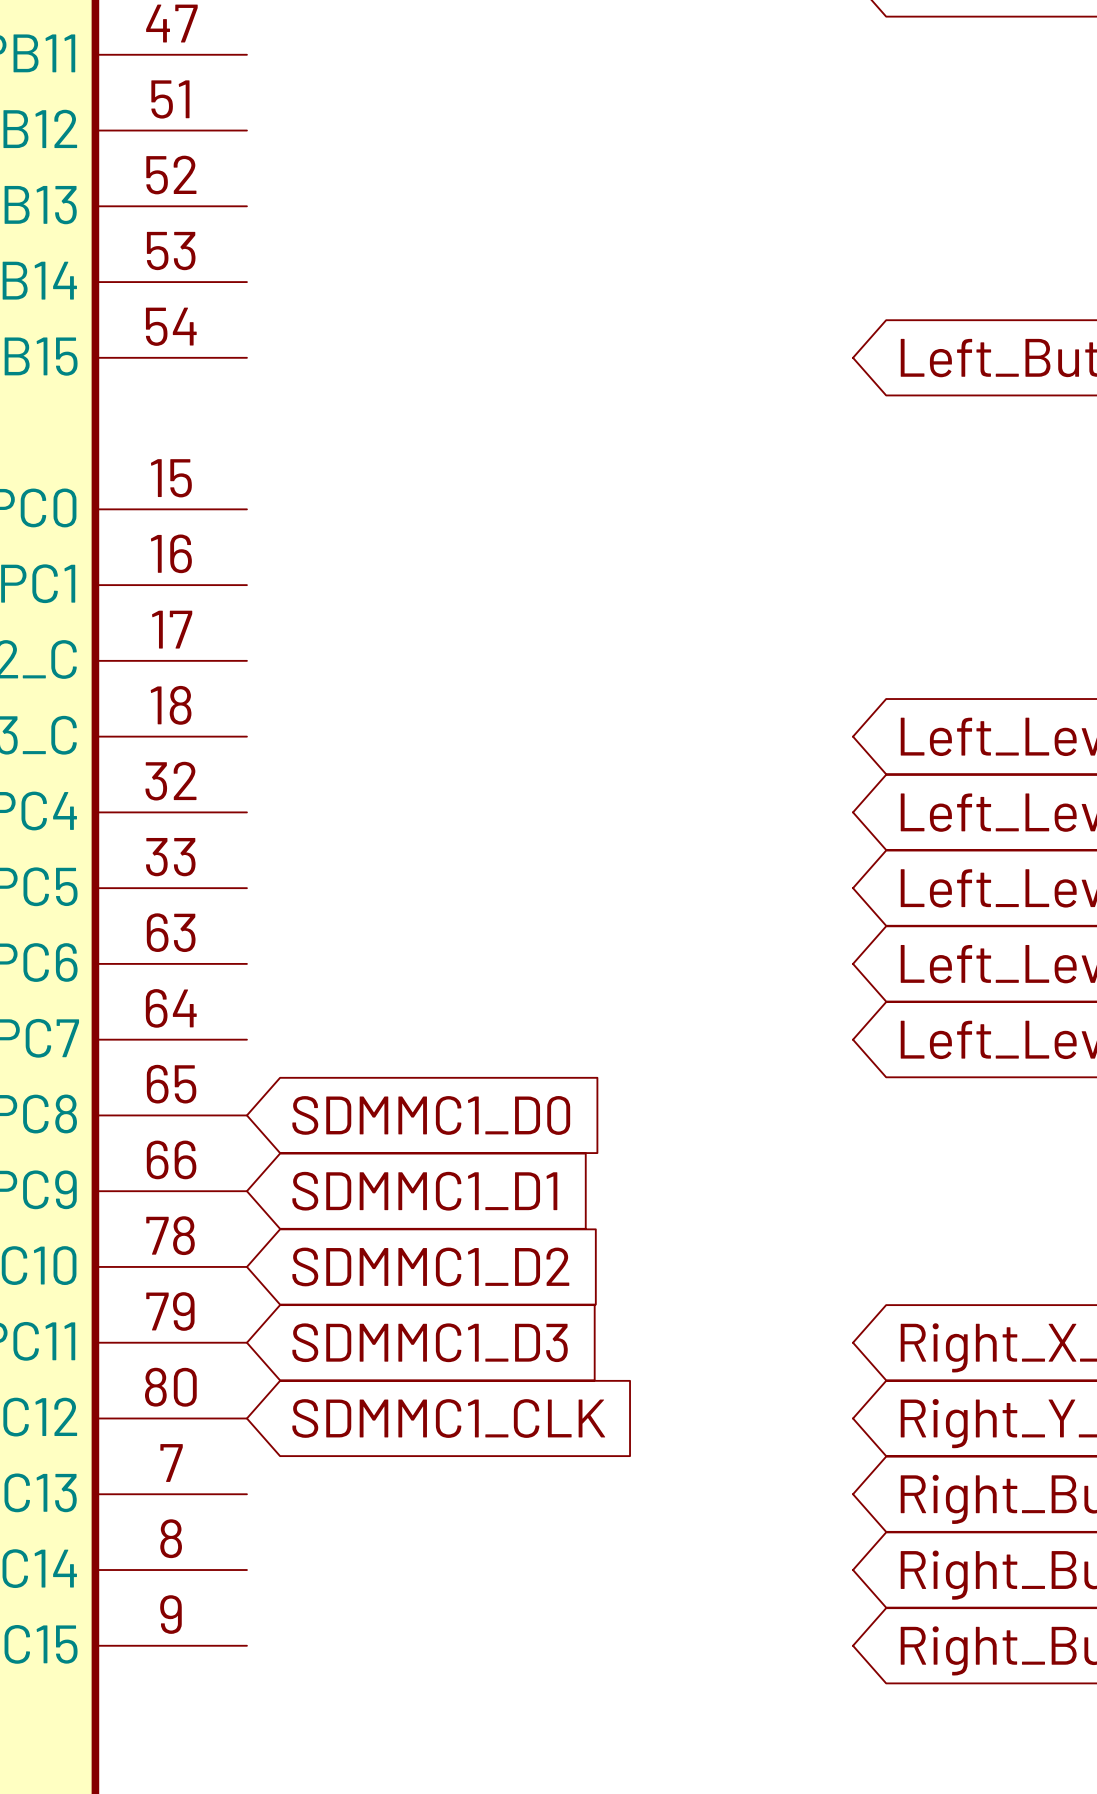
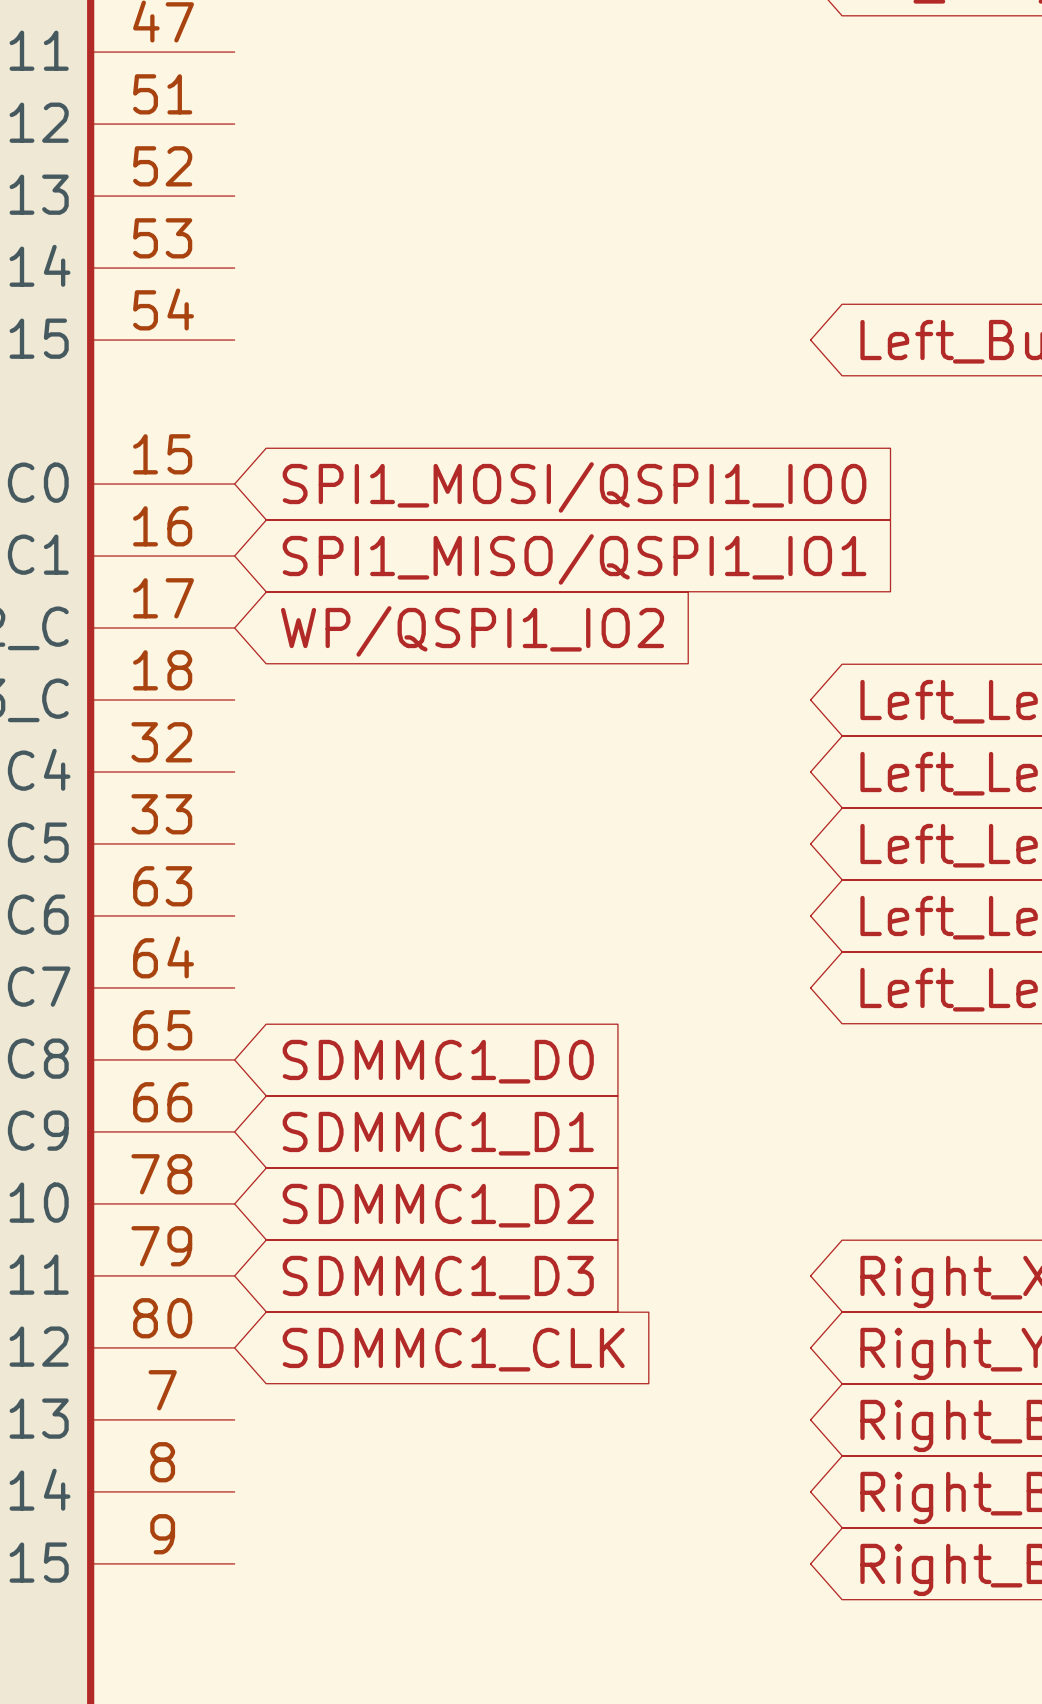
global label: none -> SPI1_MOSI/QSPI1_IO0 (574, 487)
global label: none -> SPI1_MISO/QSPI1_IO1 (574, 559)
global label: none -> WP/QSPI1_IO2 (472, 631)

